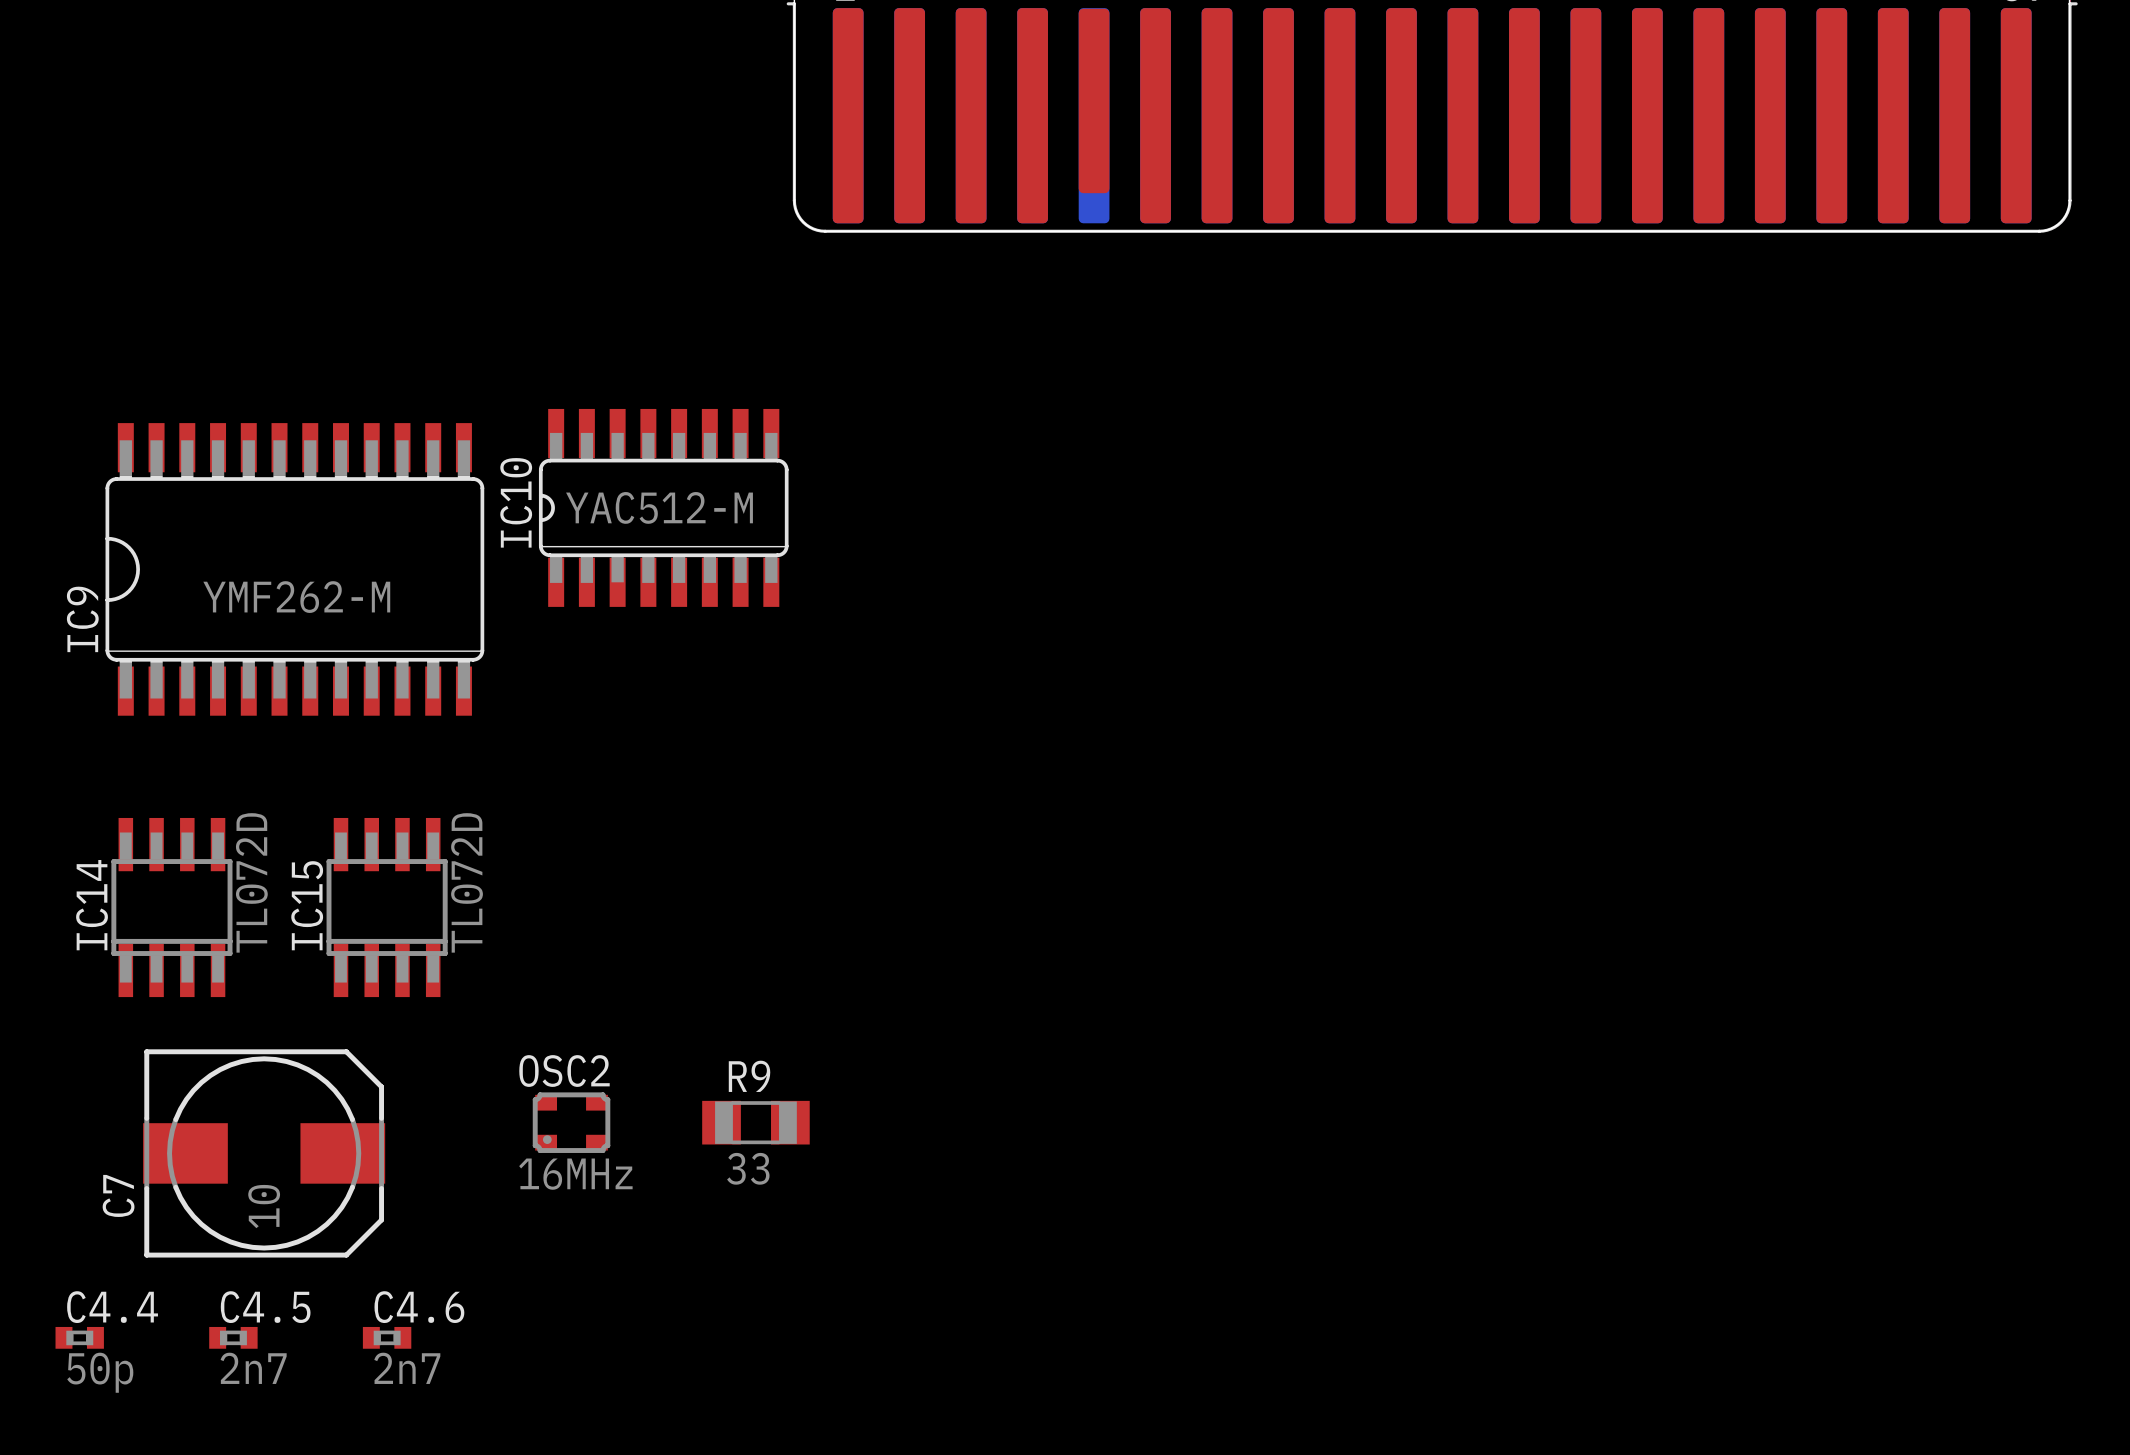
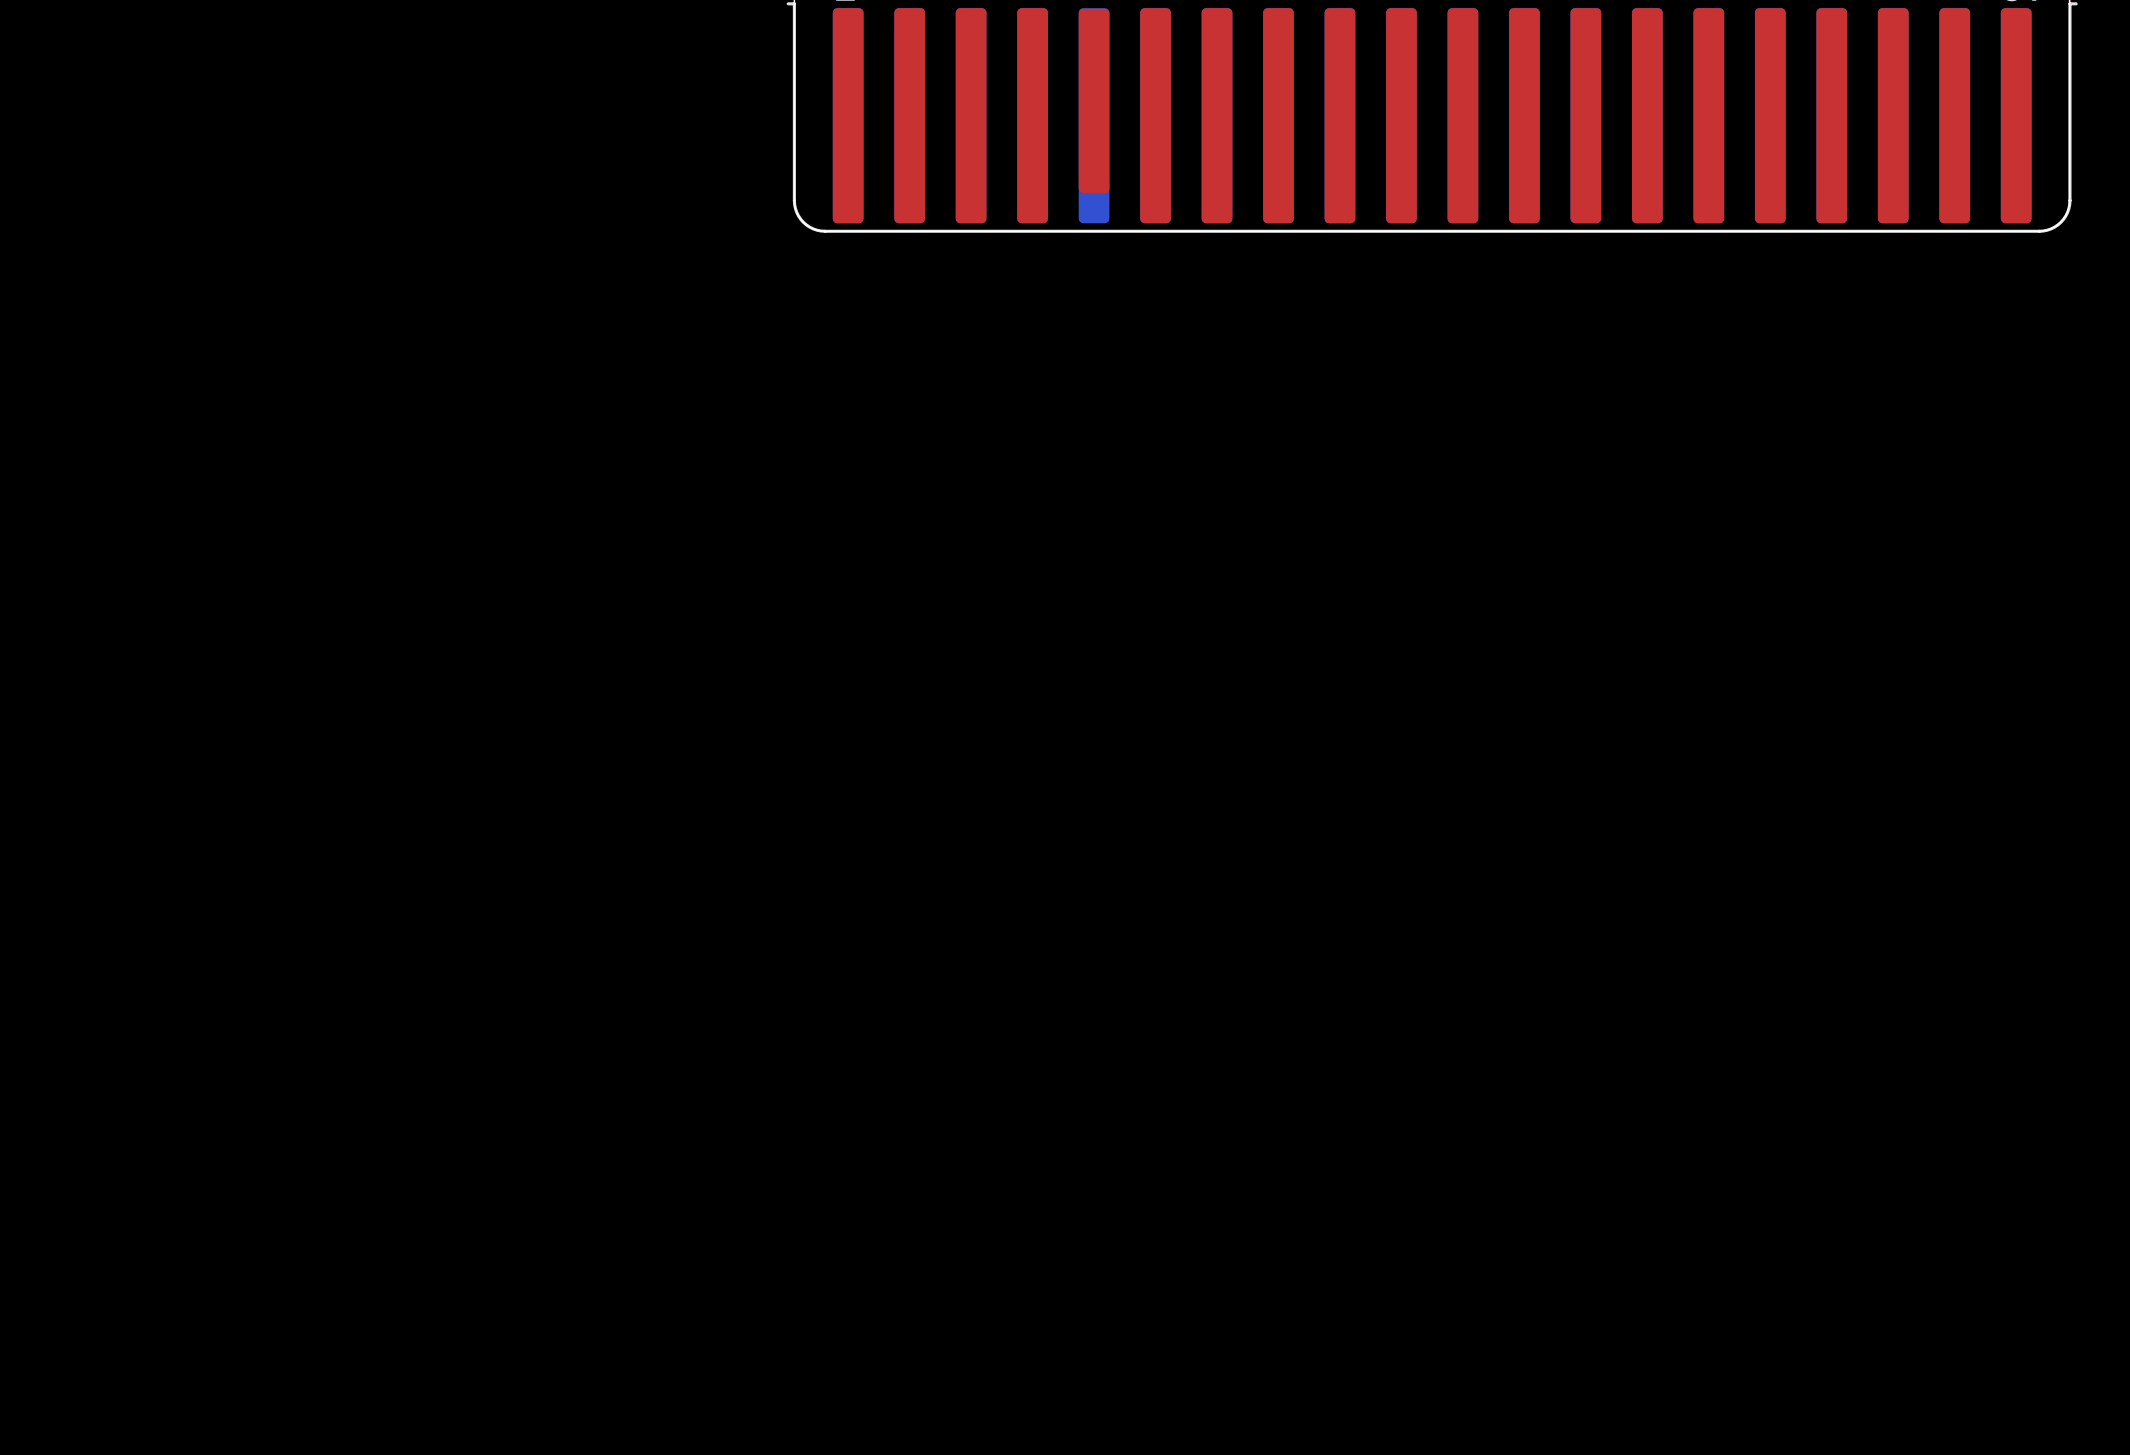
IC10: YAC512-M (663, 507) -> none
IC9: YMF262-M (294, 569) -> none
IC14: TL072D (171, 907) -> none
IC15: TL072D (387, 907) -> none
OSC2: 16MHz (571, 1122) -> none
R9: 33 (755, 1122) -> none
C7: 10 (264, 1153) -> none
C4.4: 50p (79, 1337) -> none
C4.5: 2n7 (233, 1337) -> none
C4.6: 2n7 (387, 1337) -> none

